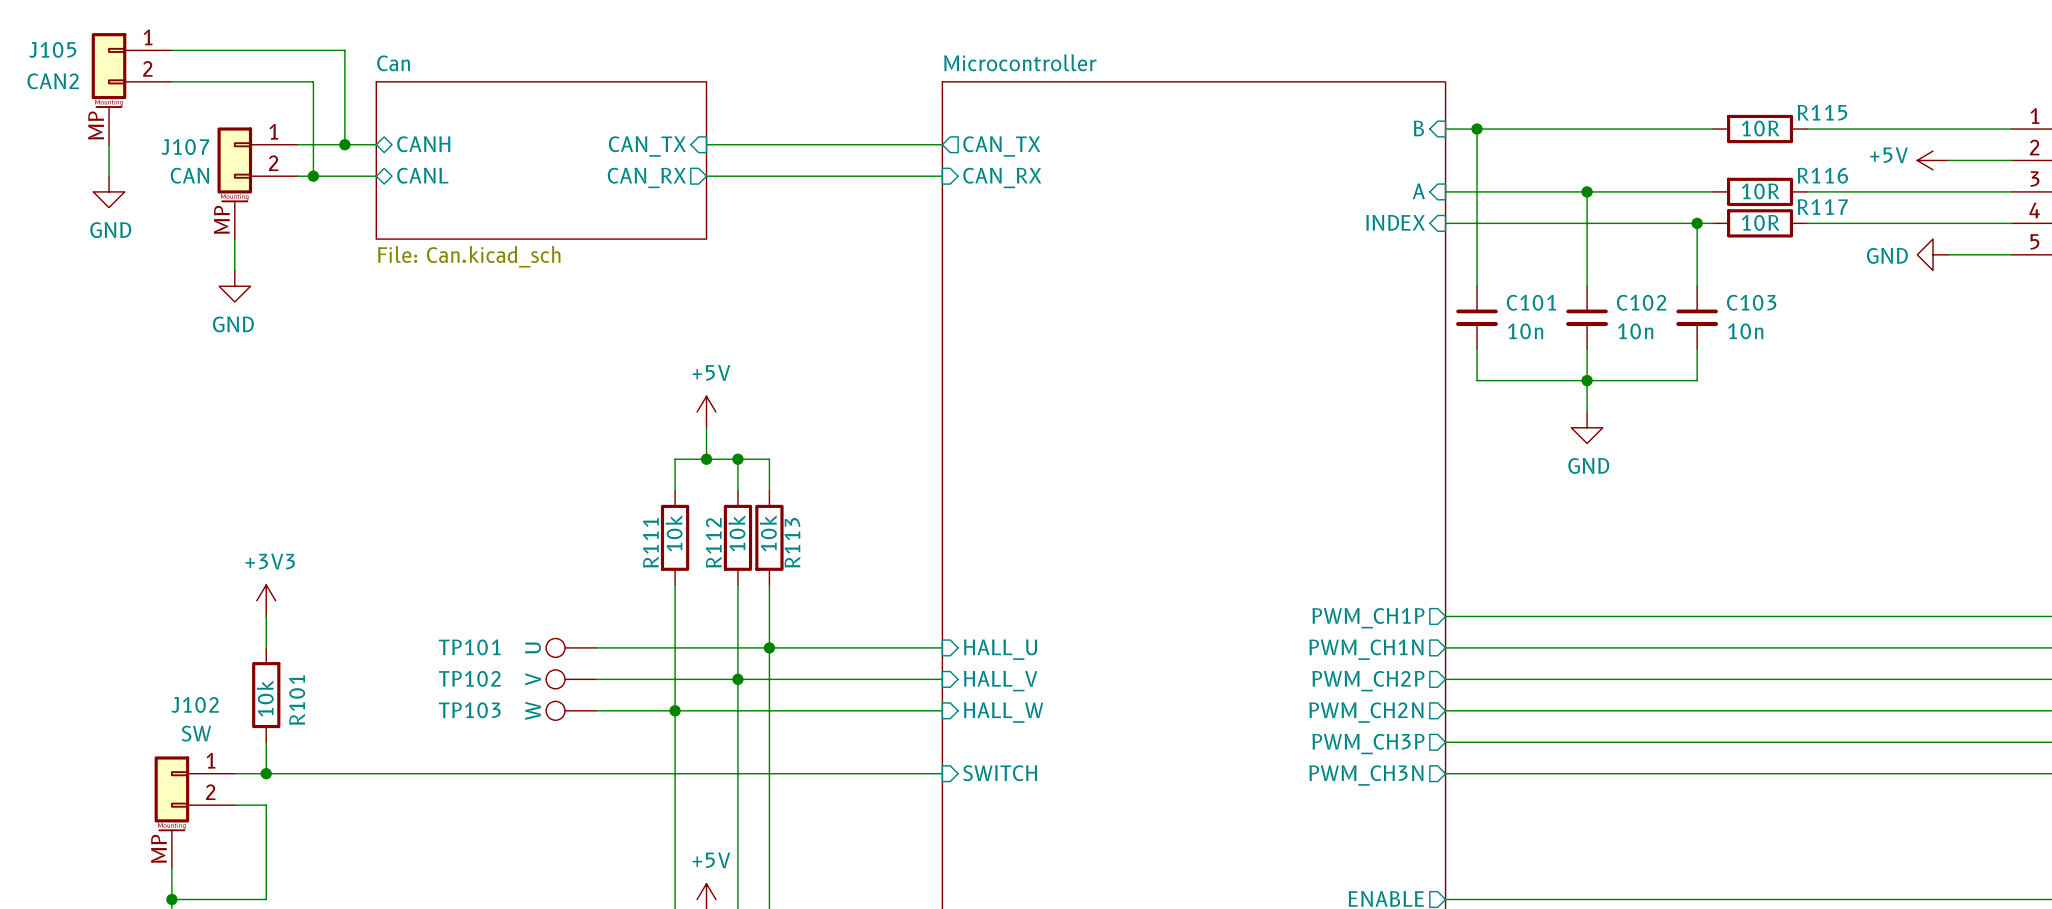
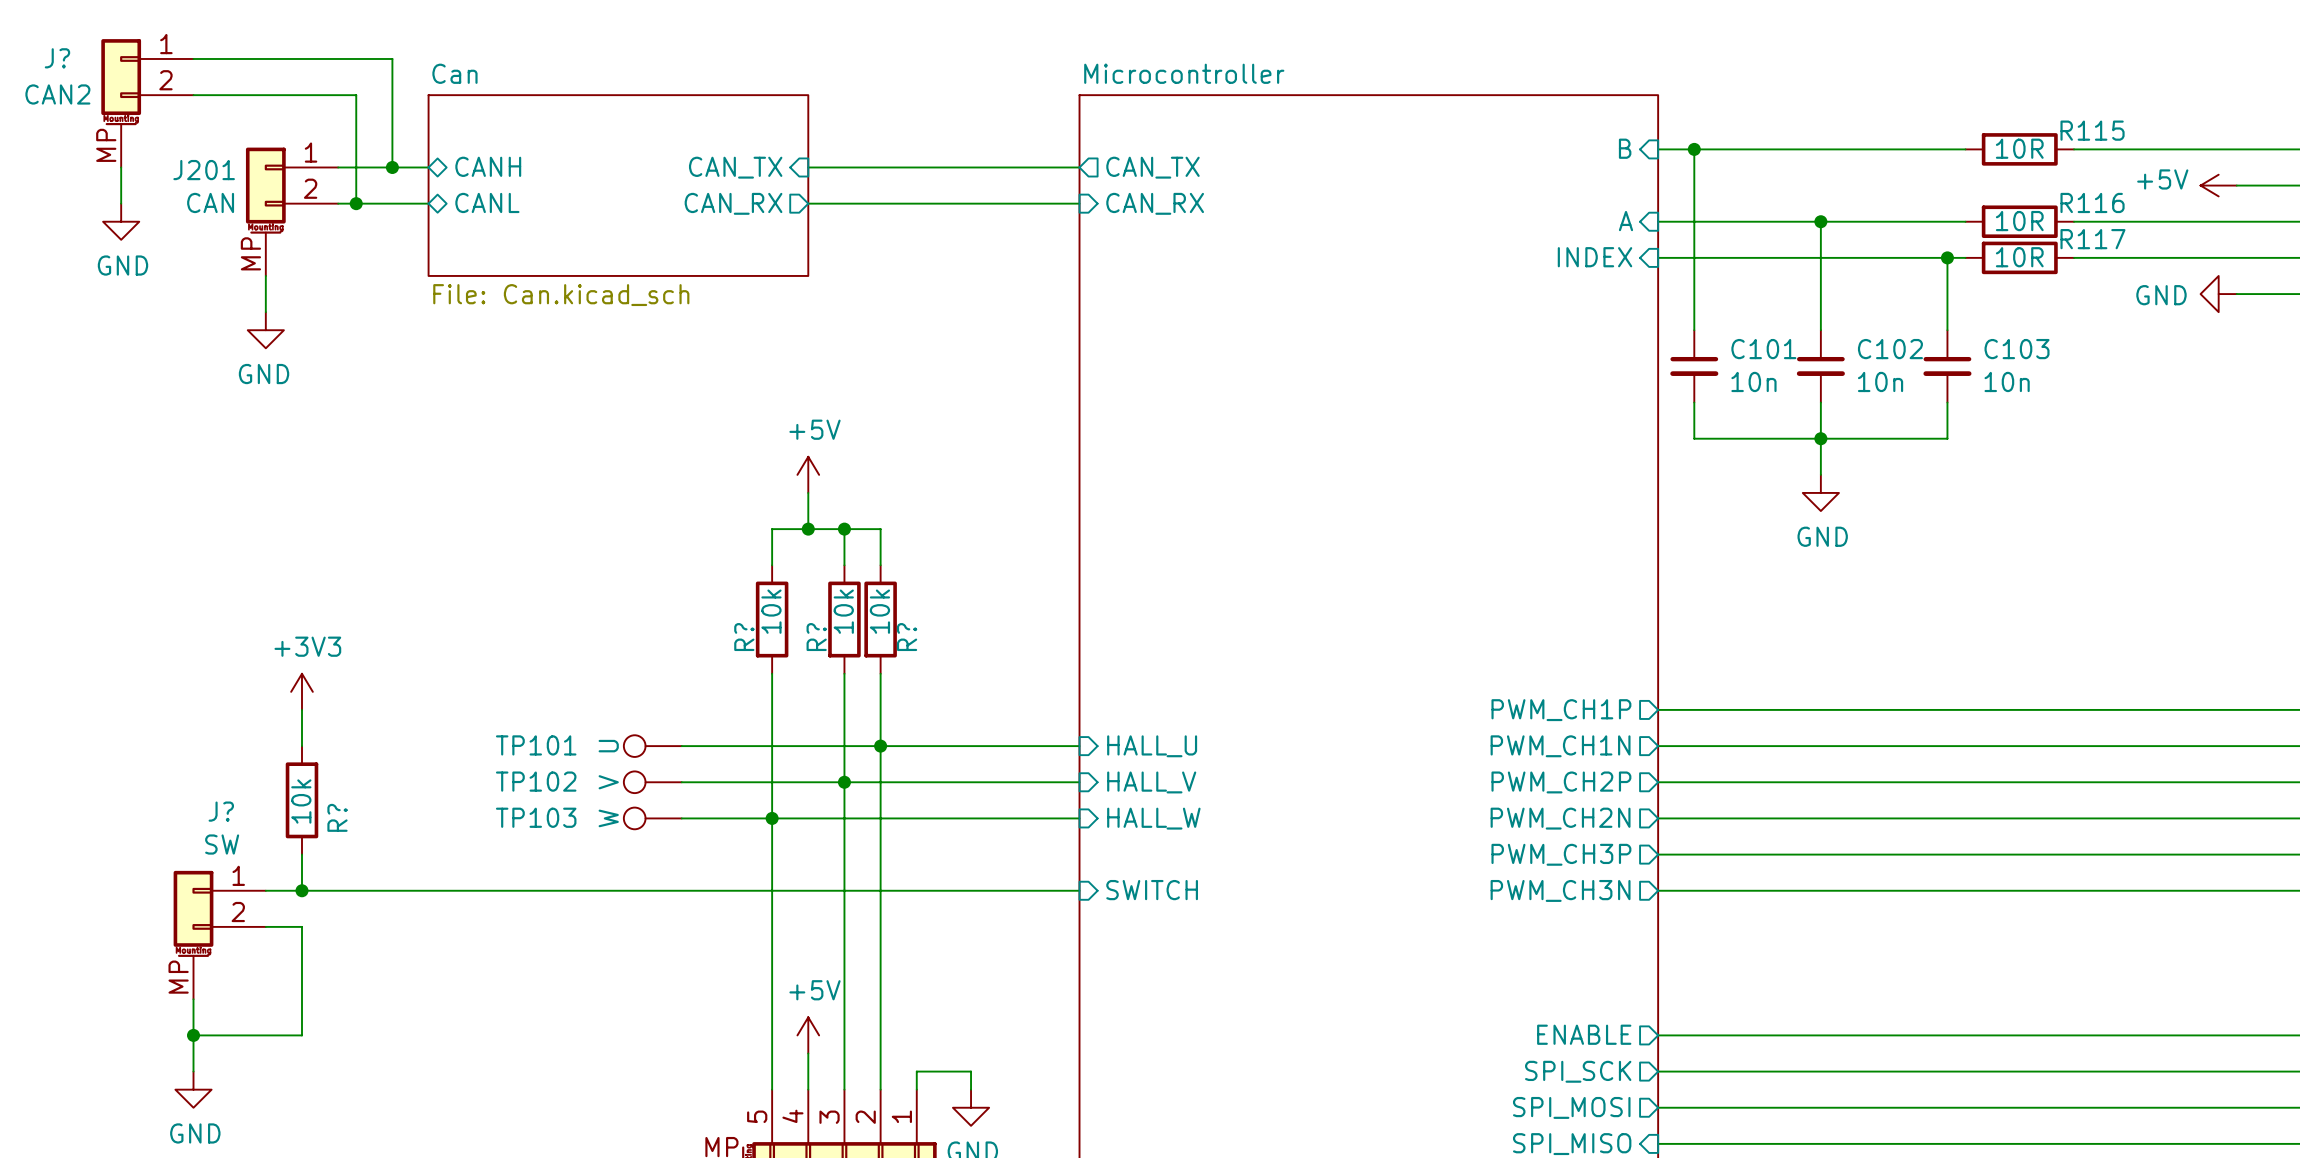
J105 name: J105 (52, 49) -> J? (57, 58)
J107 name: J107 (185, 147) -> J201 (204, 170)
R111 name: R111 (650, 542) -> R? (744, 637)
R112 name: R112 (713, 542) -> R? (816, 637)
R113 name: R113 (792, 542) -> R? (907, 637)
R101 name: R101 (297, 700) -> R? (337, 817)
J102 name: J102 (195, 704) -> J? (221, 811)

